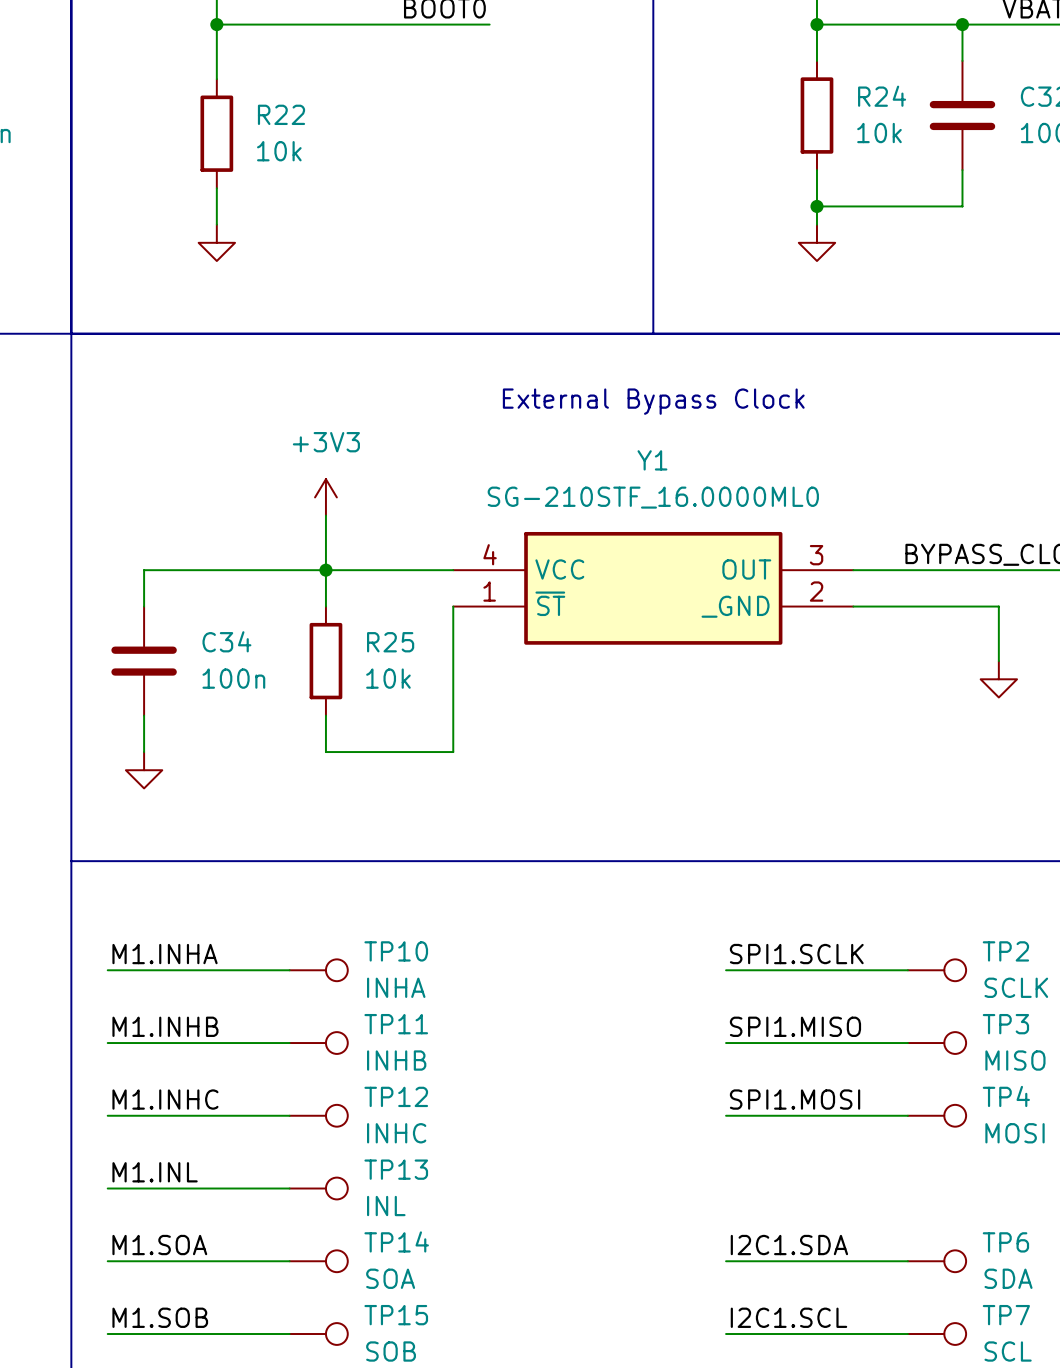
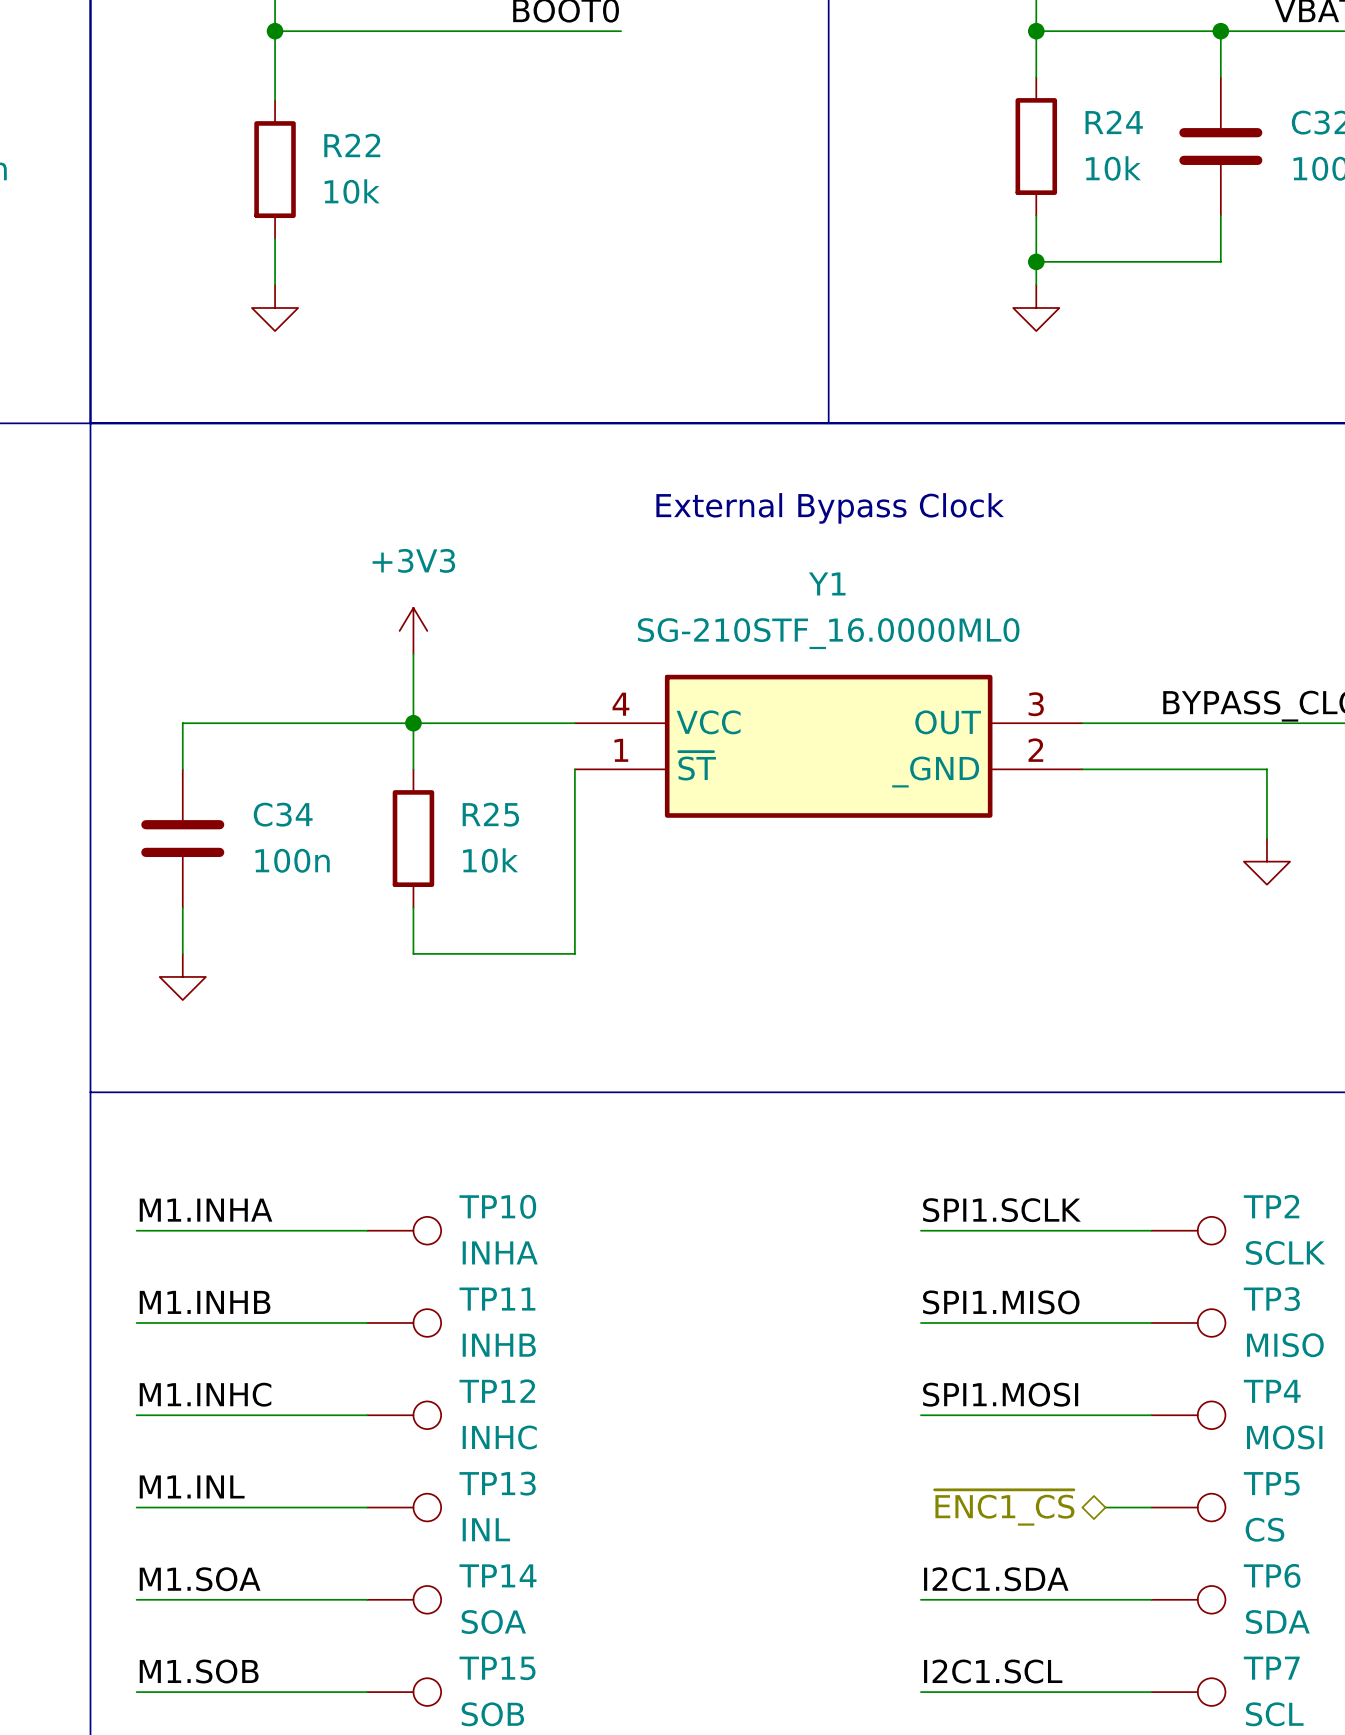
hierarchical label: none -> ~{ENC1_CS} (1004, 1507)
wire: none -> (1105, 1507) (1151, 1507)
TP5: none -> CS (1188, 1507)

